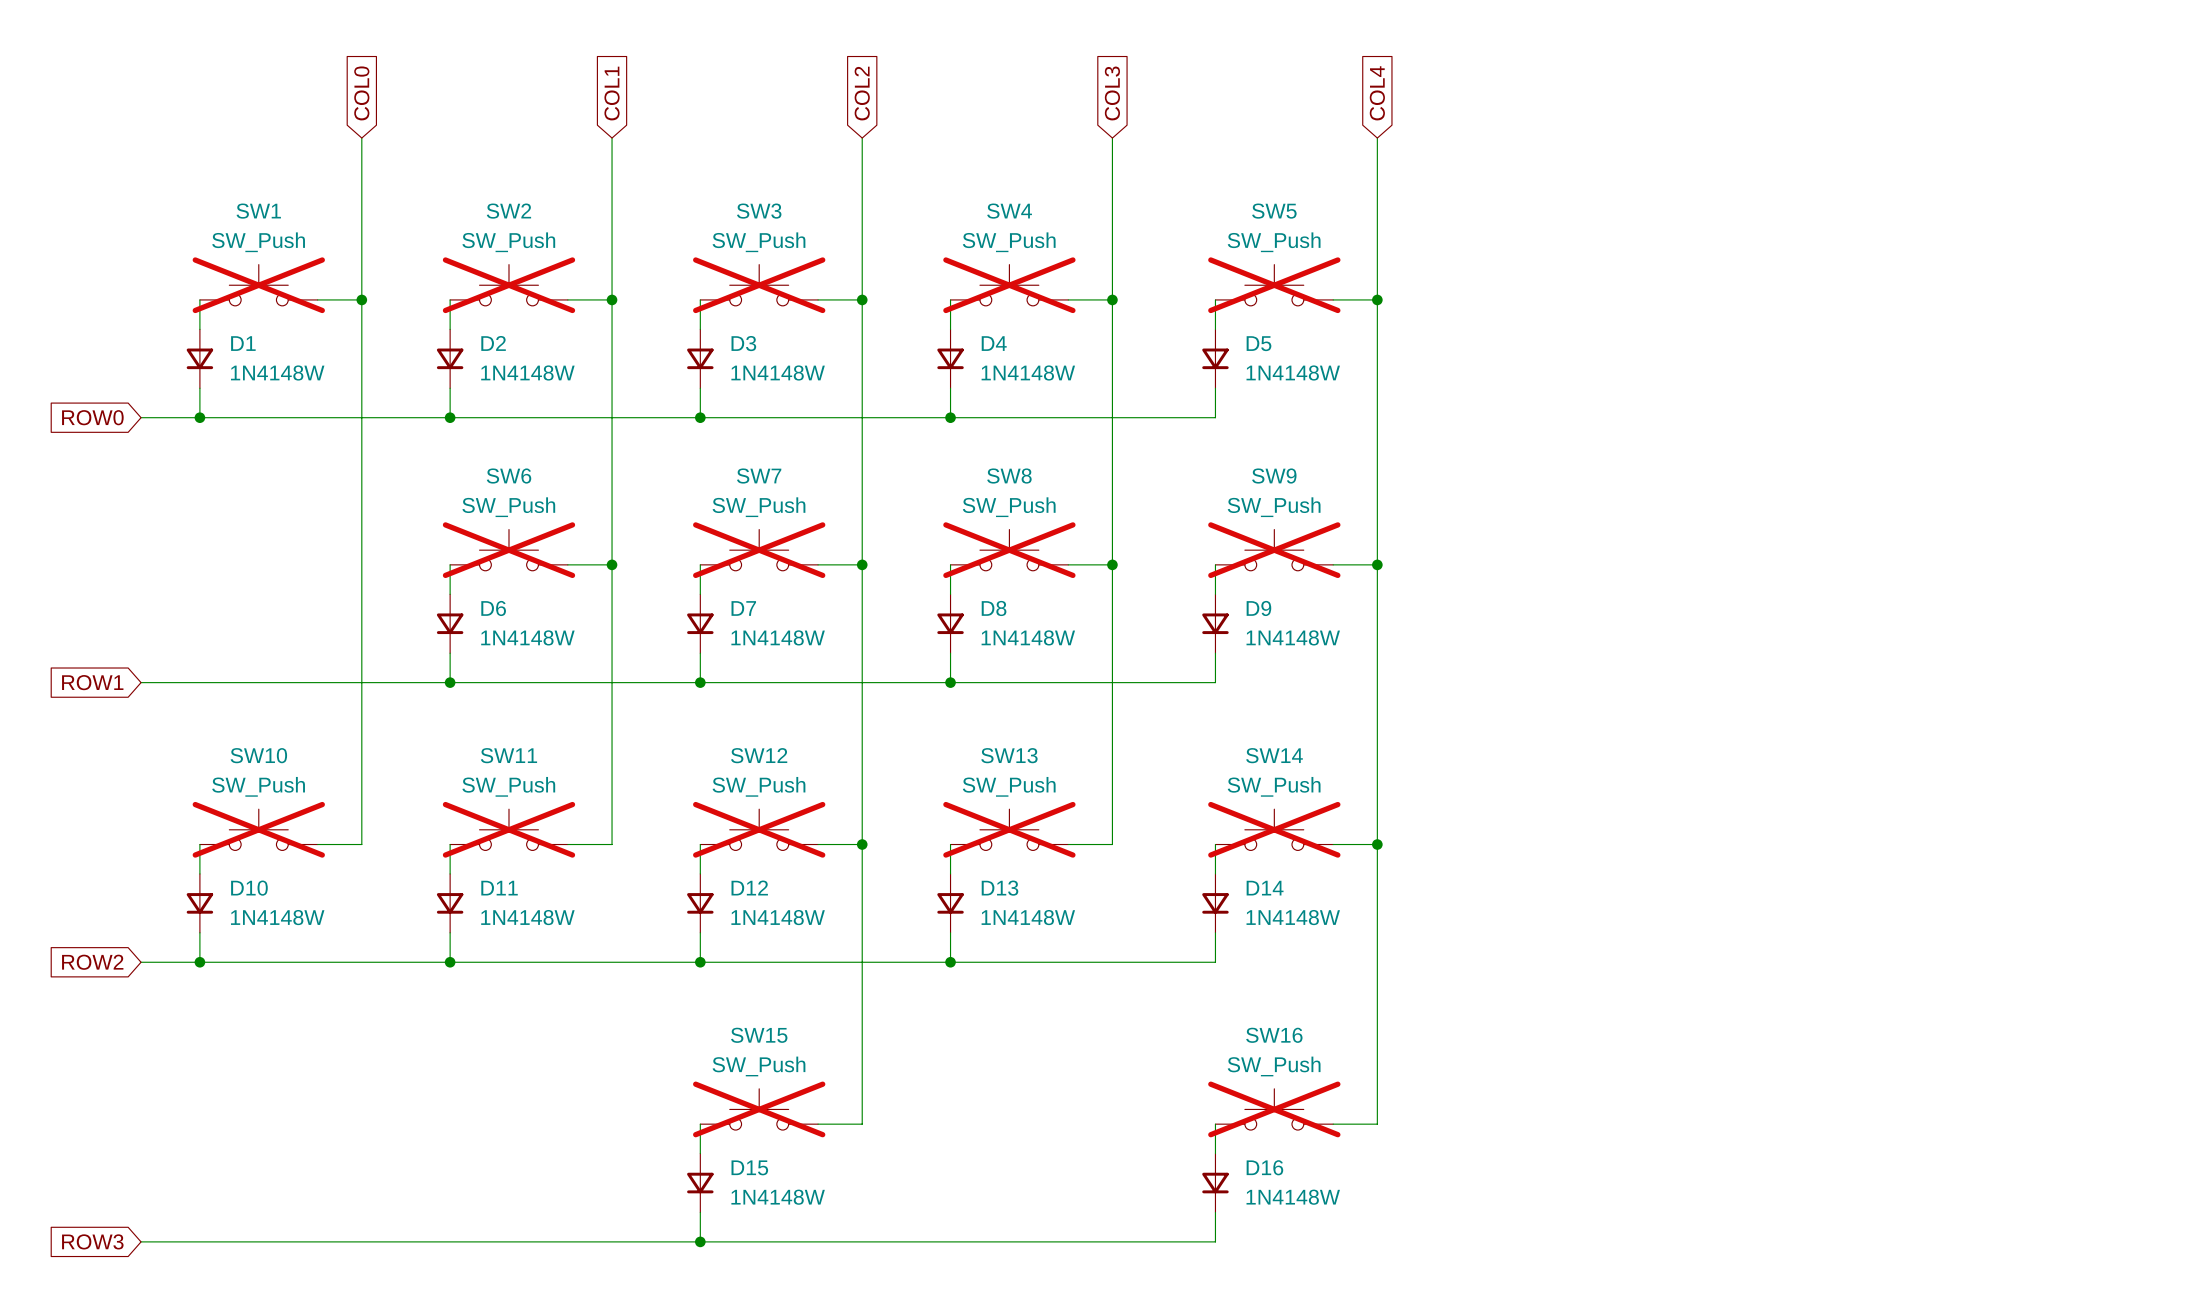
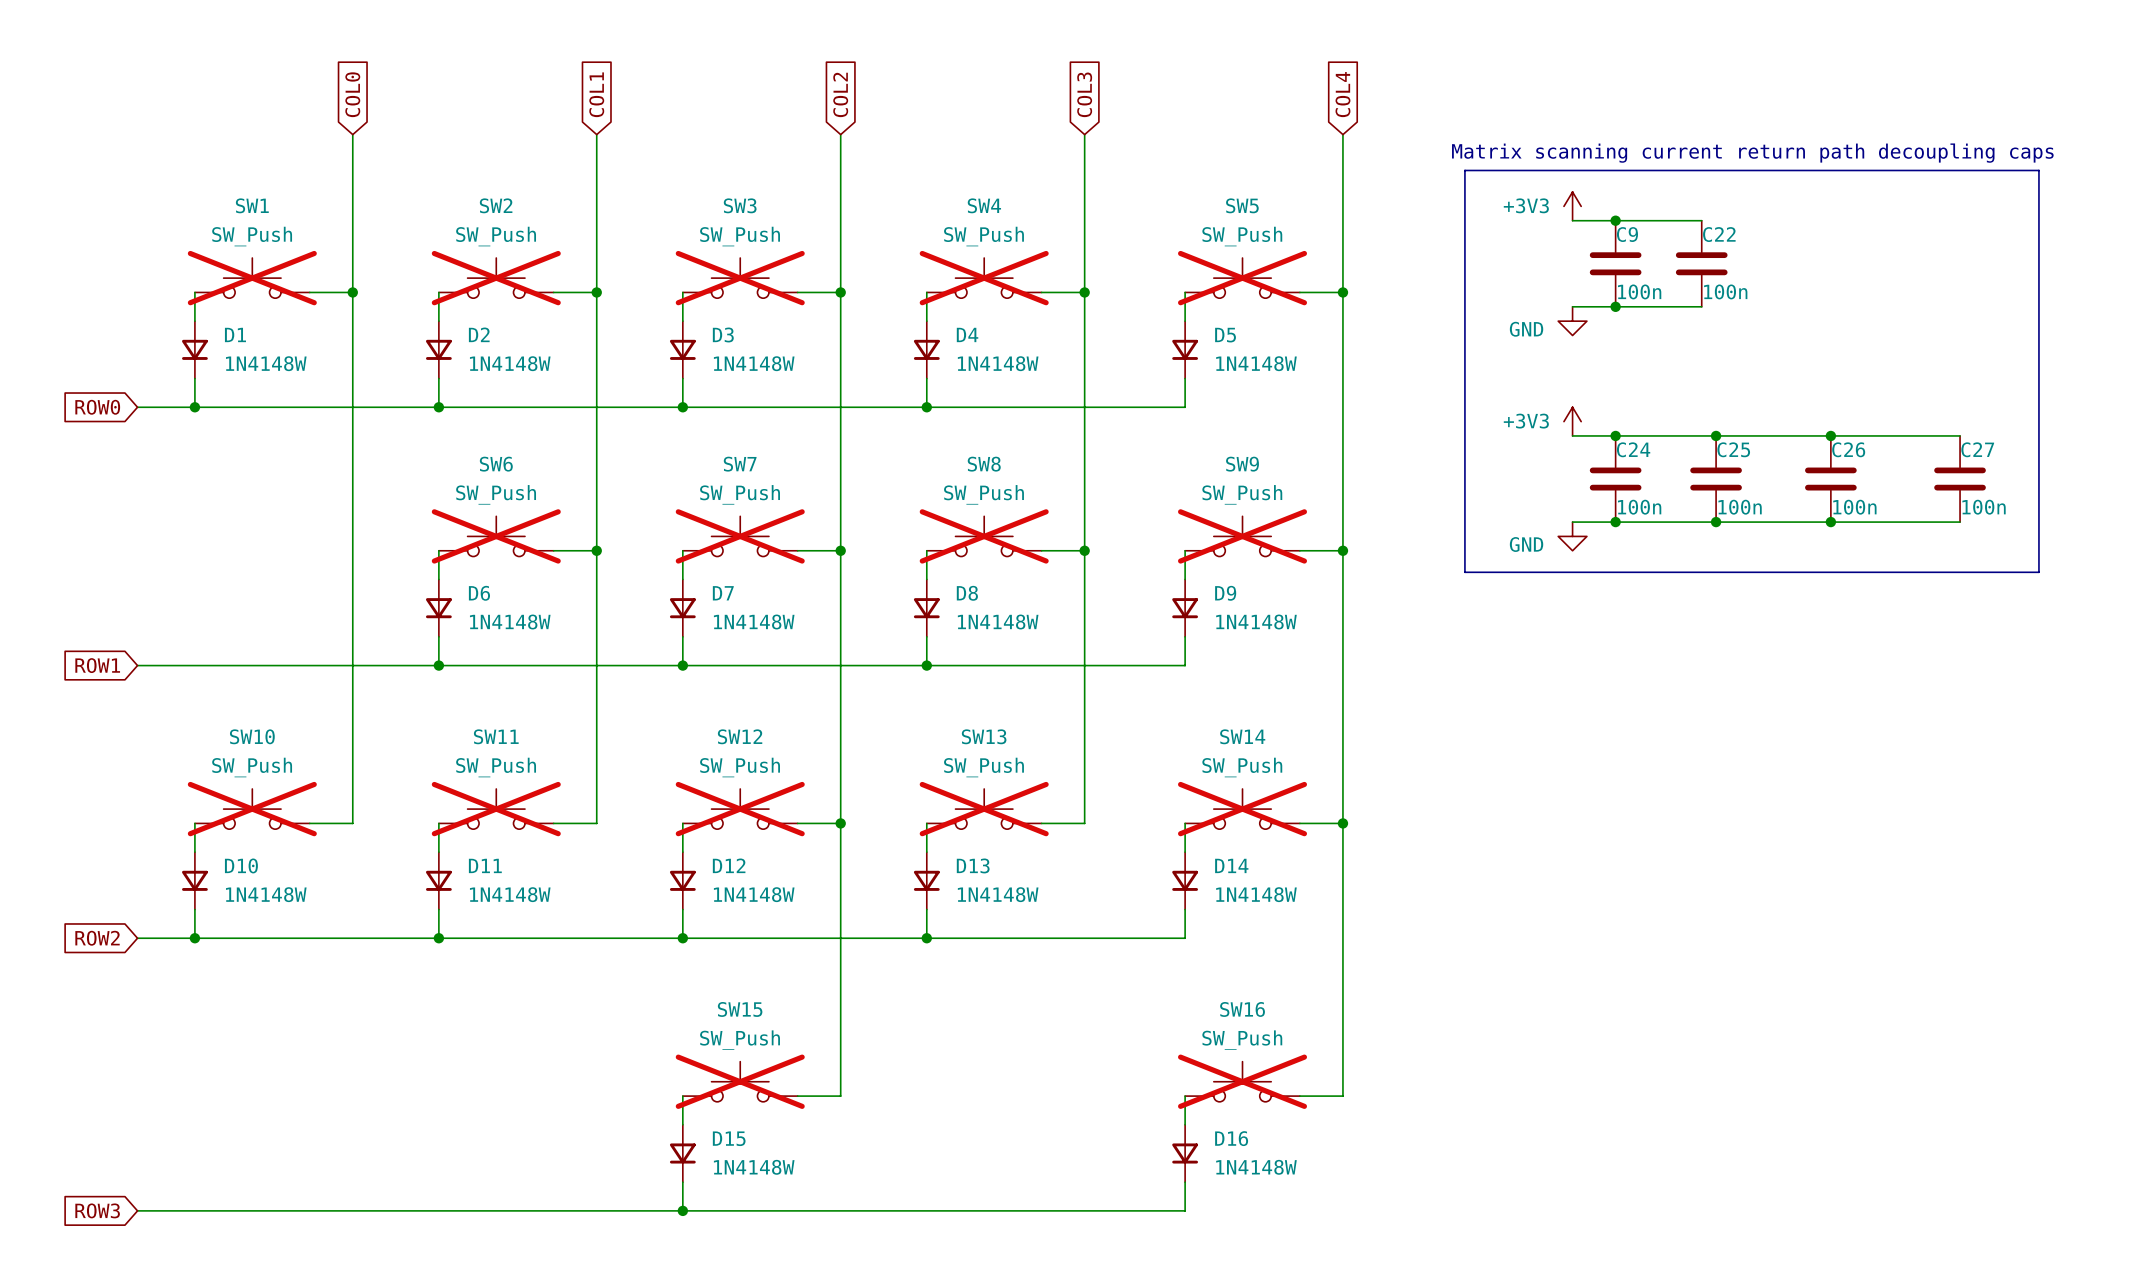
text: none -> Matrix scanning current return path decoupling caps (1752, 153)
line: none -> (1464, 170) (2038, 170) (2038, 572) (1464, 572) (1464, 170)
power symbol: none -> +3V3 (1572, 206)
wire: none -> (1572, 220) (1701, 220)
junction: none -> (1615, 220)
C9: none -> 100n (1615, 263)
C22: none -> 100n (1701, 263)
wire: none -> (1572, 306) (1701, 306)
junction: none -> (1615, 306)
power symbol: none -> GND (1572, 321)
power symbol: none -> +3V3 (1572, 421)
wire: none -> (1572, 435) (1960, 435)
junction: none -> (1615, 435)
junction: none -> (1716, 435)
junction: none -> (1830, 435)
C24: none -> 100n (1615, 479)
C25: none -> 100n (1716, 479)
C26: none -> 100n (1830, 479)
C27: none -> 100n (1960, 479)
wire: none -> (1572, 522) (1960, 522)
junction: none -> (1615, 522)
junction: none -> (1716, 522)
junction: none -> (1830, 522)
power symbol: none -> GND (1572, 536)

